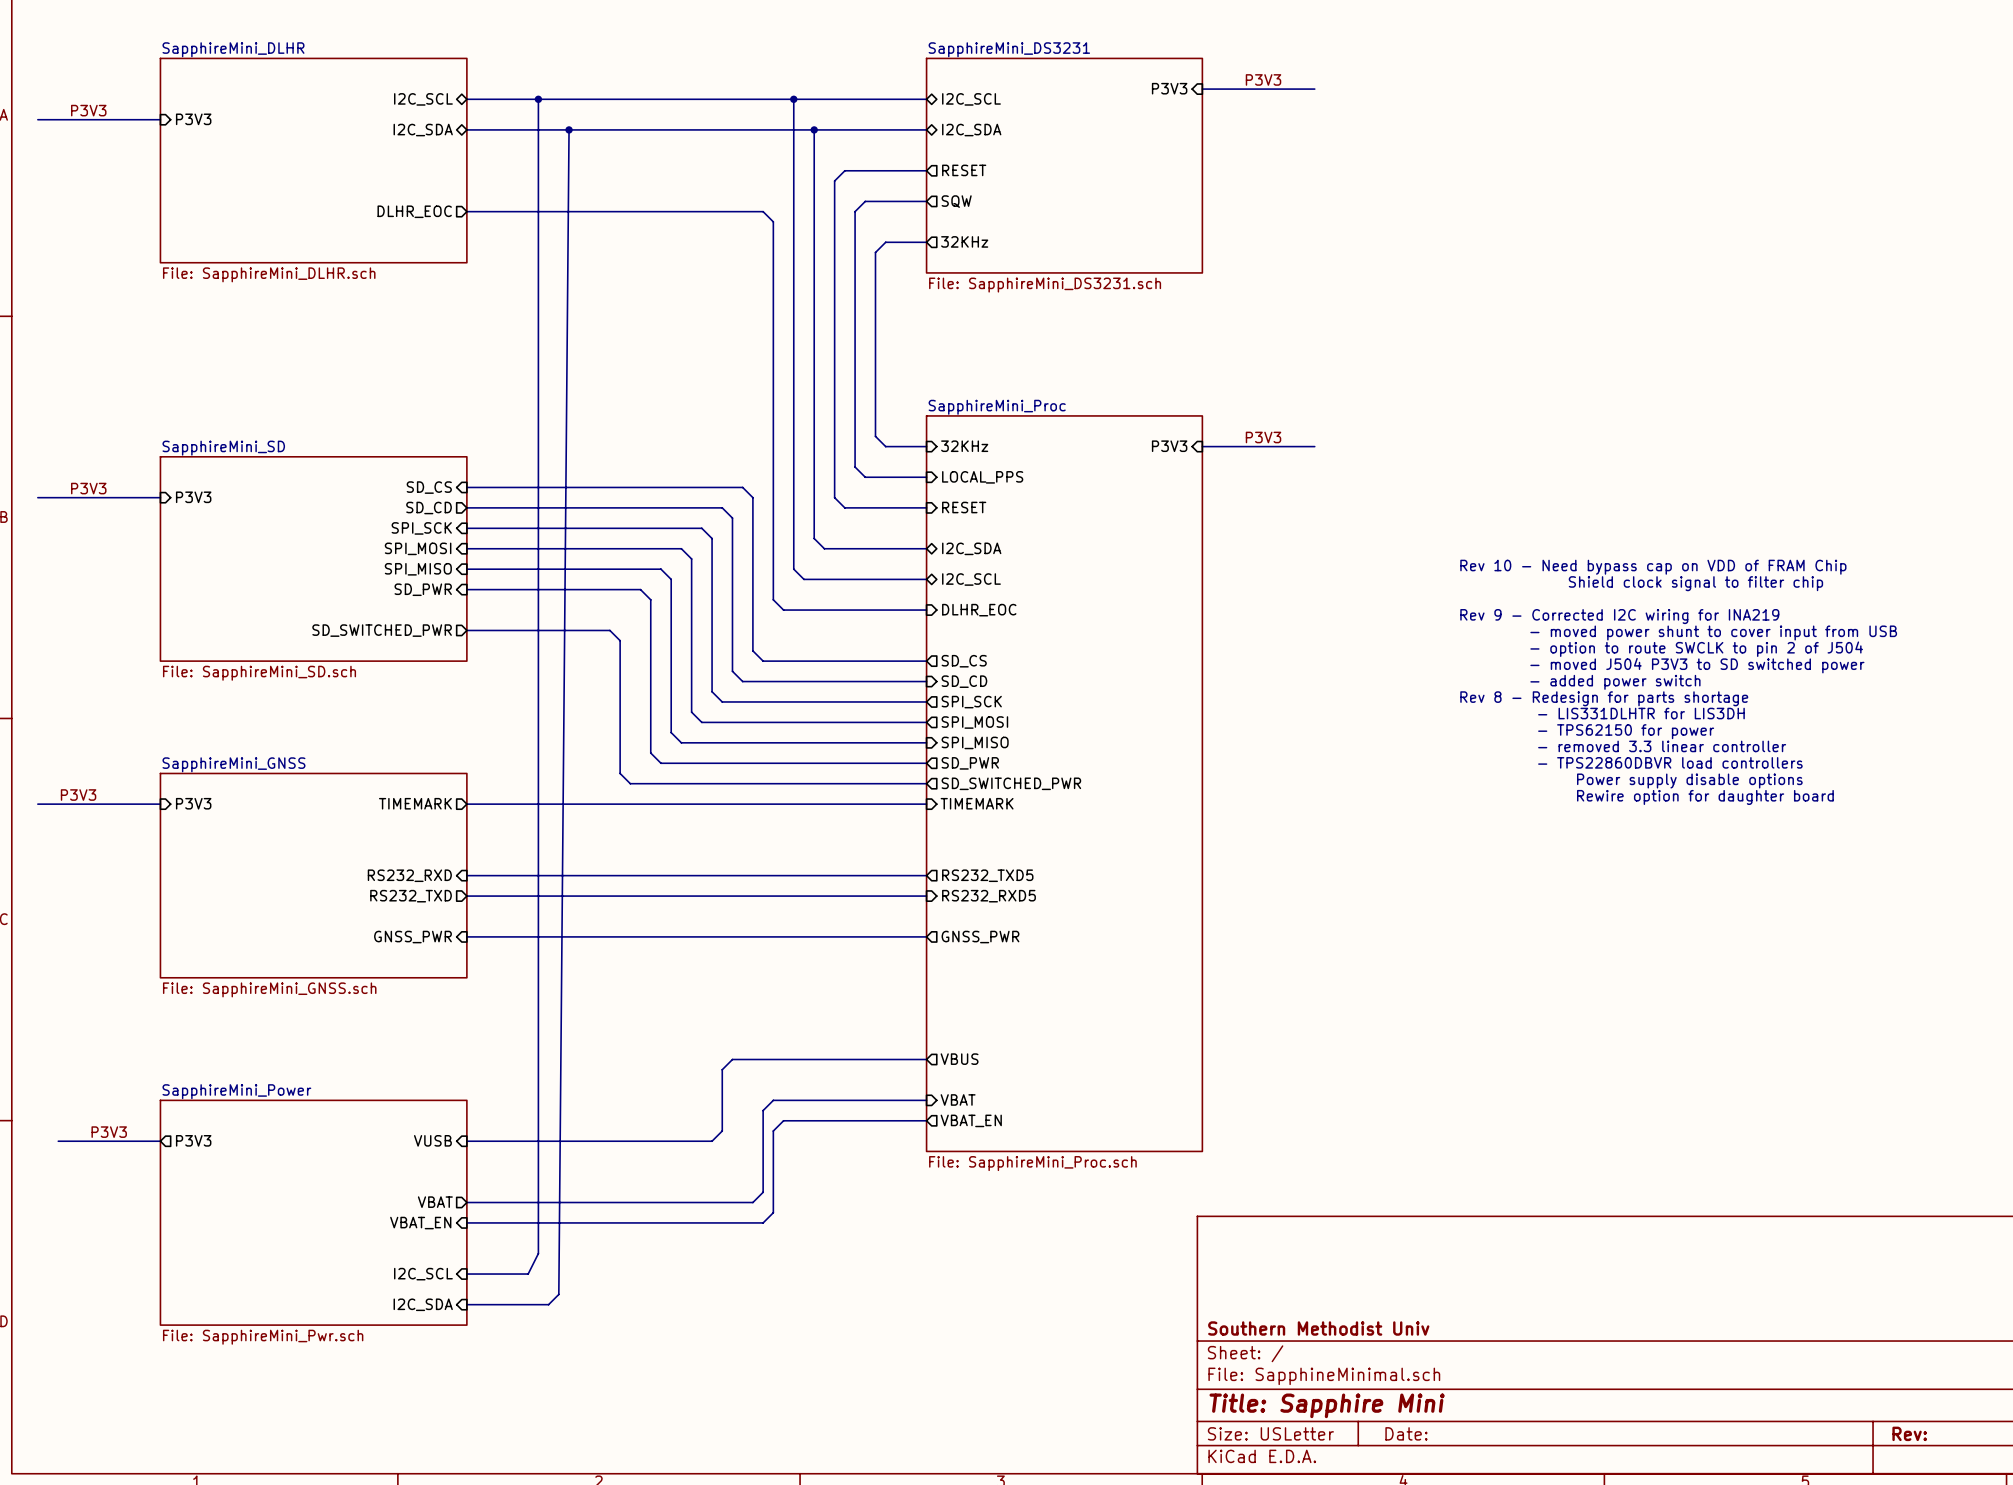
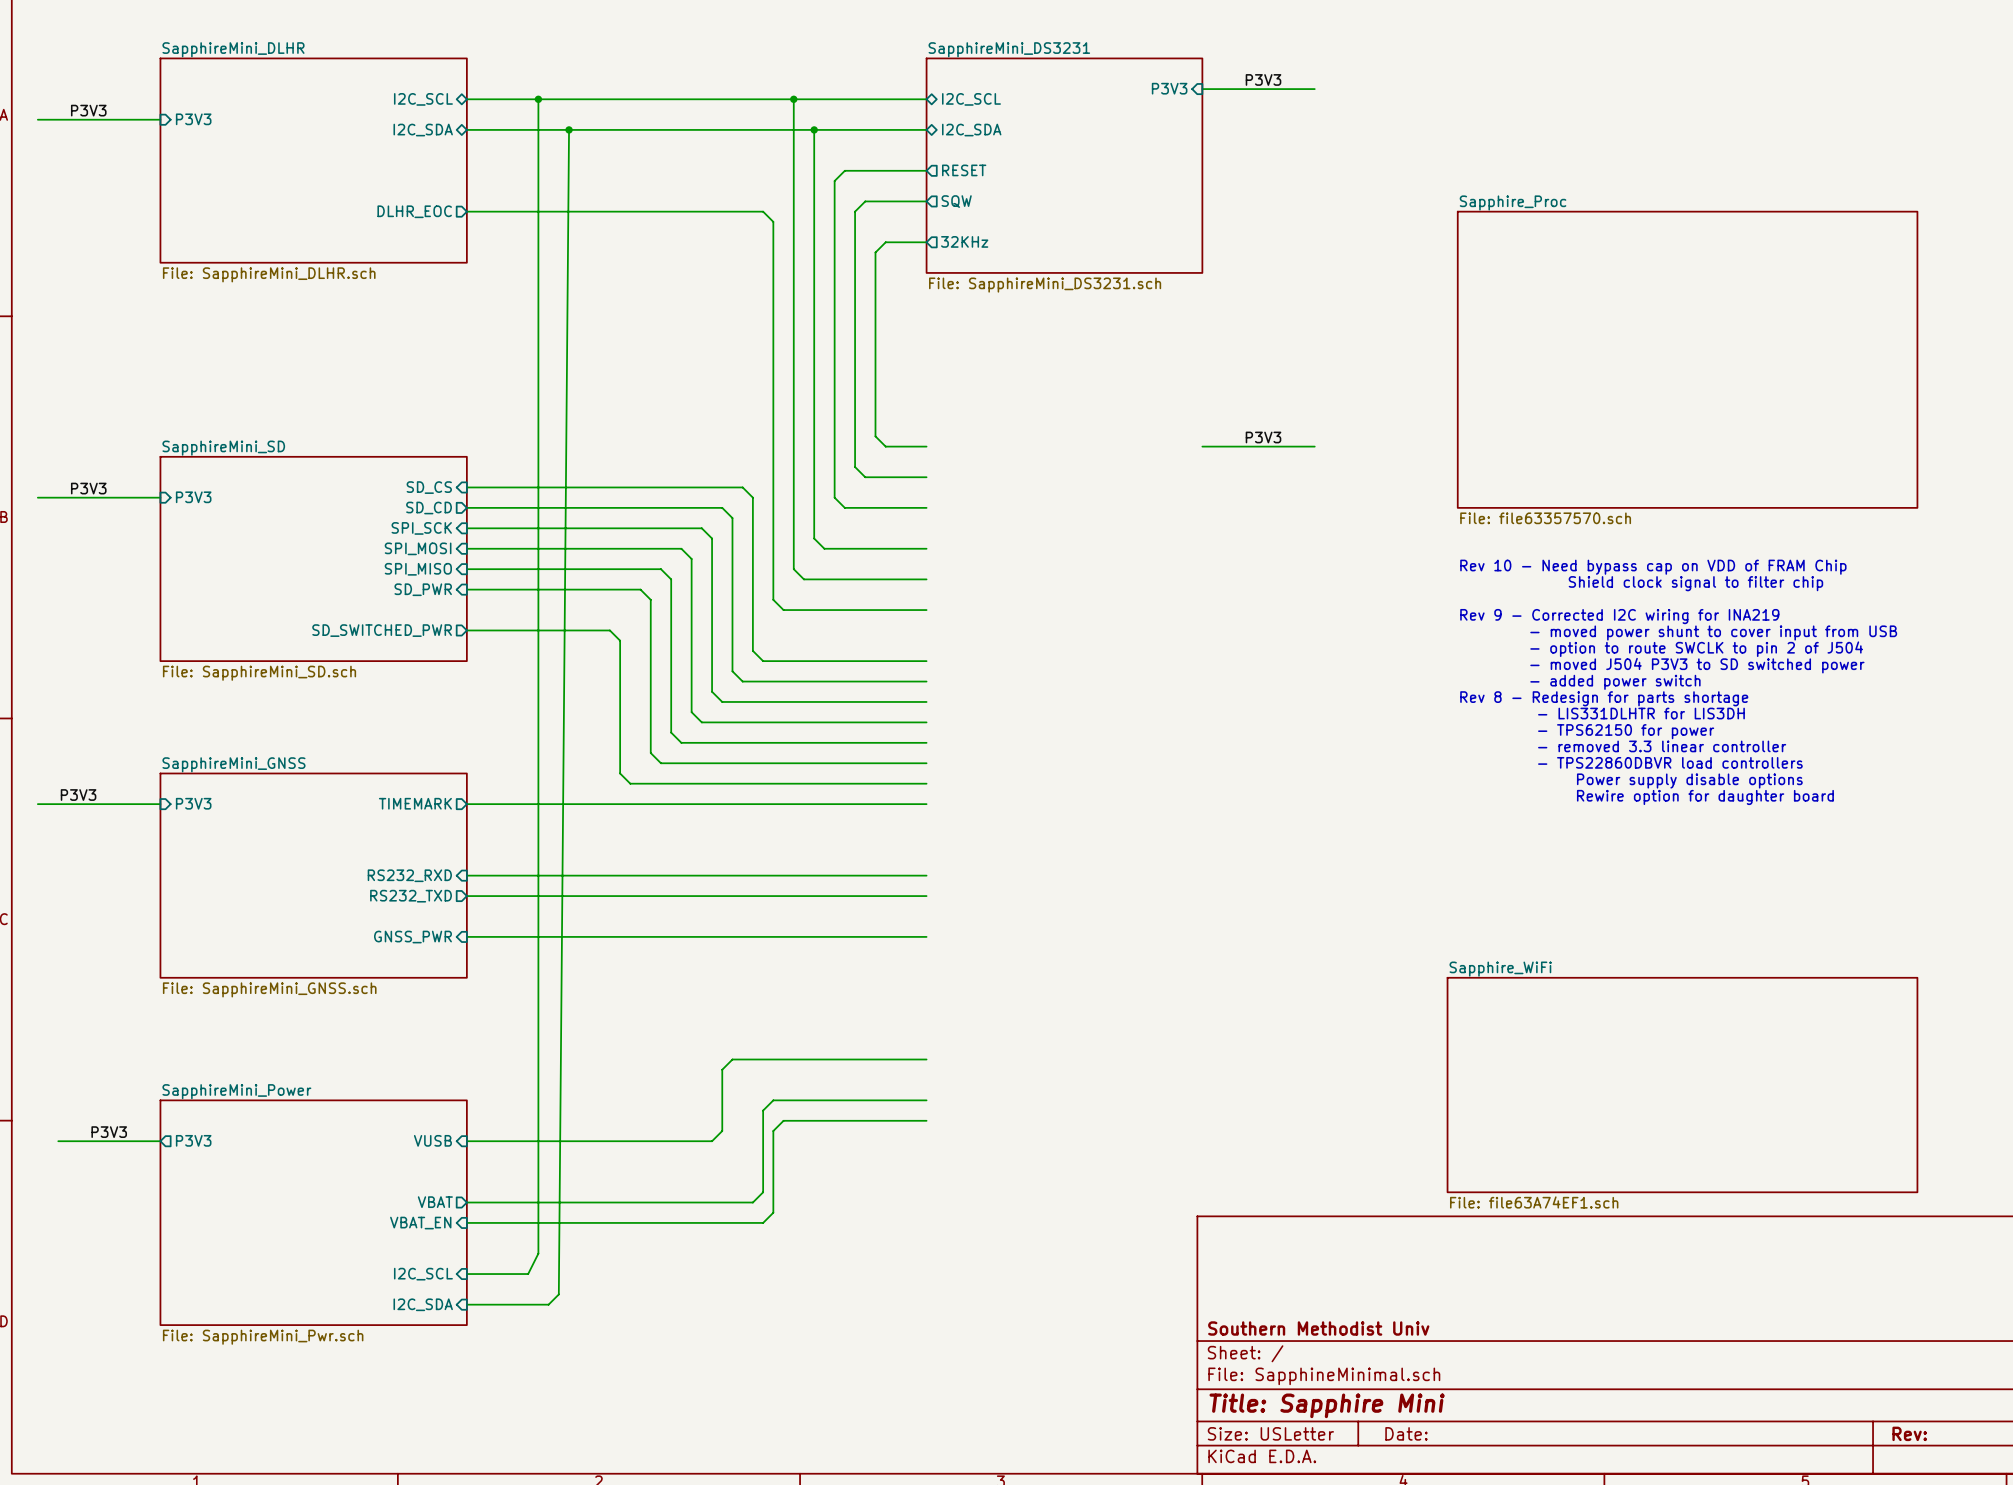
sheet Sapphire_Proc: none -> File: file63357570.sch (1687, 359)
sheet pin: 32KHz (964, 446) -> none
sheet pin: P3V3 (1169, 446) -> none
sheet pin: LOCAL_PPS (982, 477) -> none
sheet pin: RESET (964, 507) -> none
sheet pin: I2C_SDA (971, 548) -> none
sheet pin: I2C_SCL (971, 579) -> none
sheet pin: DLHR_EOC (979, 610) -> none
sheet pin: SD_CS (964, 661) -> none
sheet pin: SD_CD (964, 681) -> none
sheet pin: SPI_SCK (971, 702) -> none
sheet pin: SPI_MOSI (974, 722) -> none
sheet pin: SPI_MISO (975, 742) -> none
sheet pin: SD_PWR (970, 763) -> none
sheet pin: SD_SWITCHED_PWR (1011, 783) -> none
sheet SapphireMini_Proc: File: SapphireMini_Proc.sch (1064, 783) -> none
sheet pin: TIMEMARK (977, 803) -> none
sheet pin: RS232_TXD5 (987, 875) -> none
sheet pin: RS232_RXD5 (988, 896) -> none
sheet pin: GNSS_PWR (980, 937) -> none
sheet pin: VBUS (959, 1059) -> none
sheet Sapphire_WiFi: none -> File: file63A74EF1.sch (1682, 1085)
sheet pin: VBAT (958, 1099) -> none
sheet pin: VBAT_EN (971, 1120) -> none

